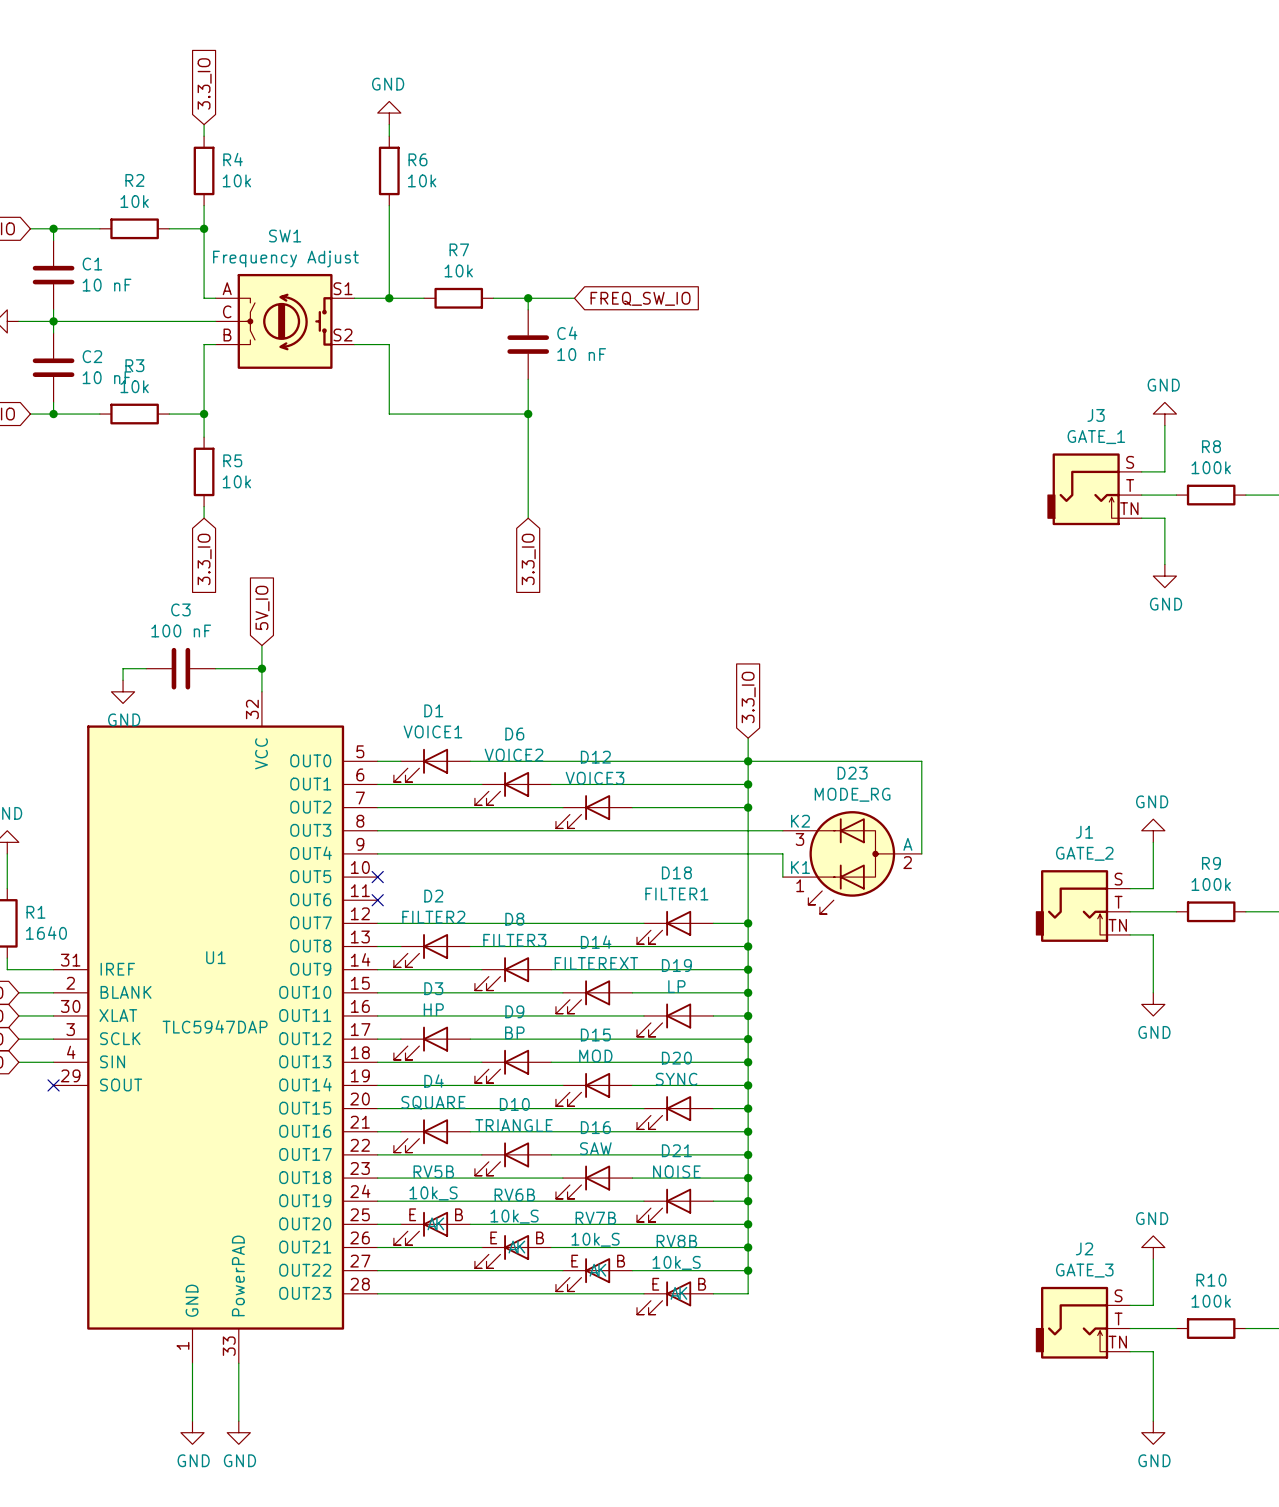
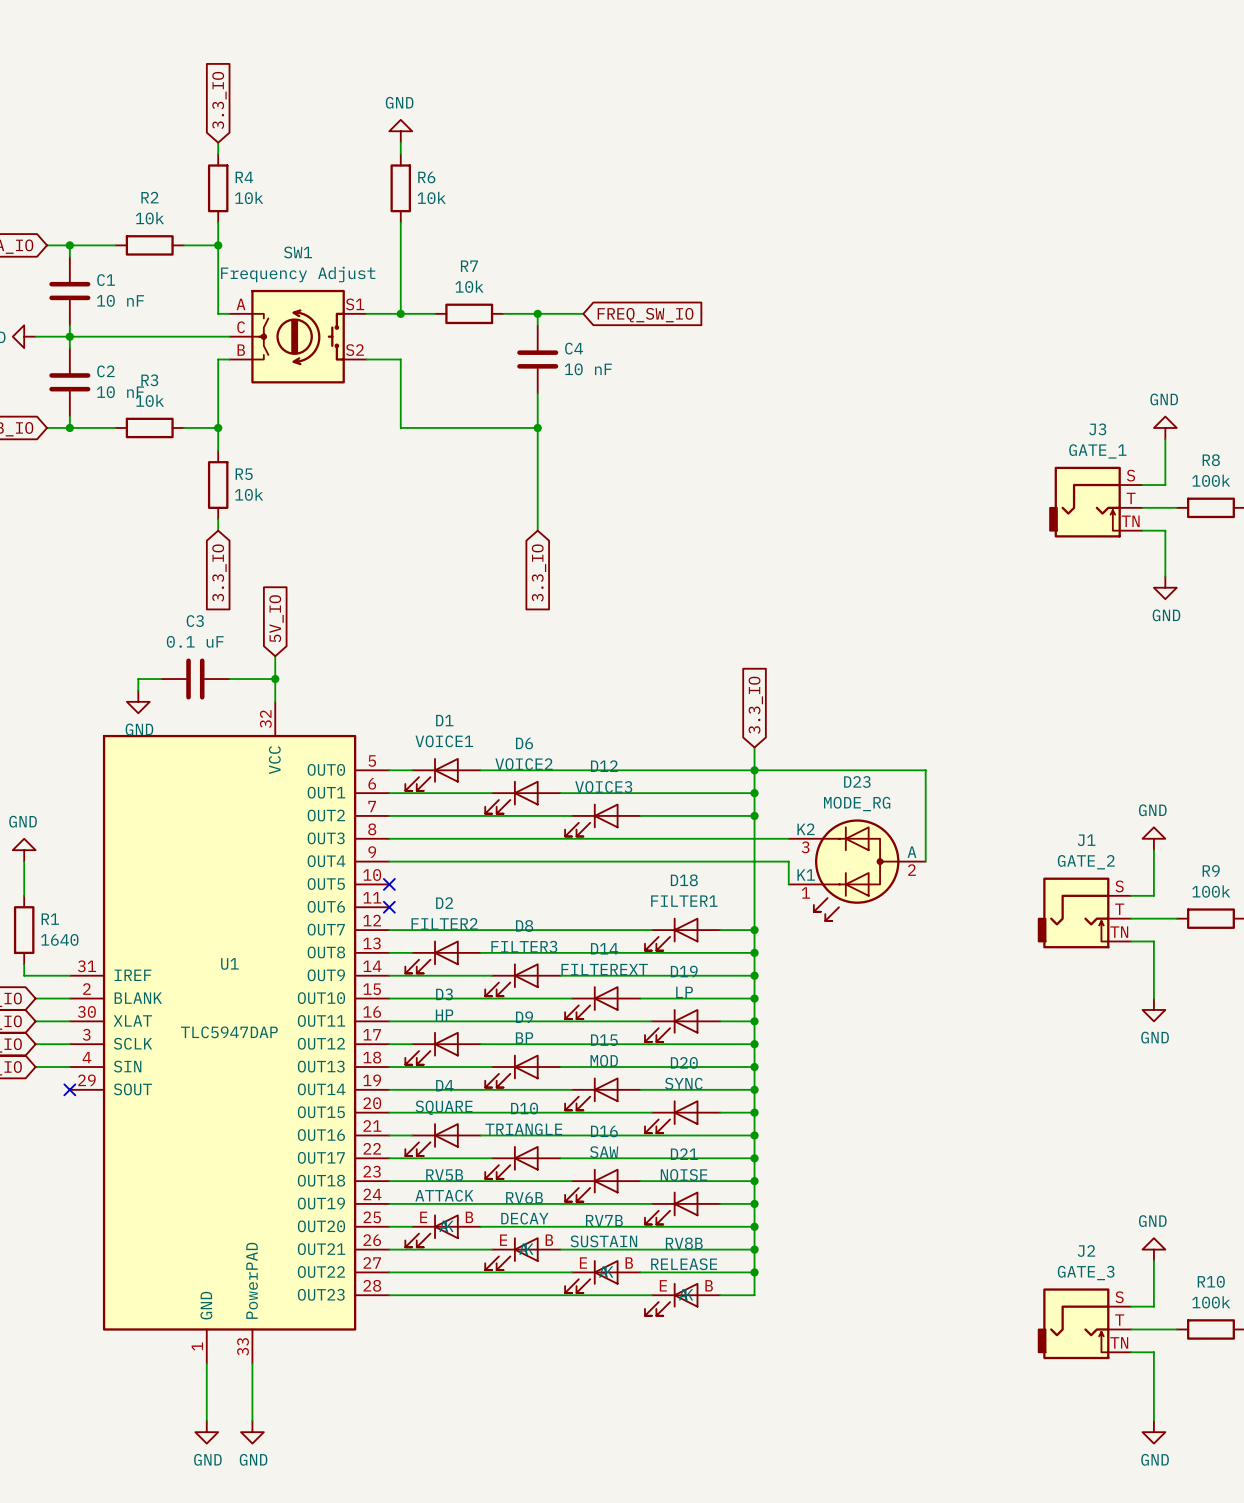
C3 value: 100 nF (181, 630) -> 0.1 uF (195, 641)
RV5B value: 10k_S (433, 1193) -> ATTACK (444, 1195)
RV6B value: 10k_S (514, 1216) -> DECAY (524, 1218)
RV7B value: 10k_S (595, 1239) -> SUSTAIN (603, 1241)
RV8B value: 10k_S (676, 1262) -> RELEASE (684, 1264)

